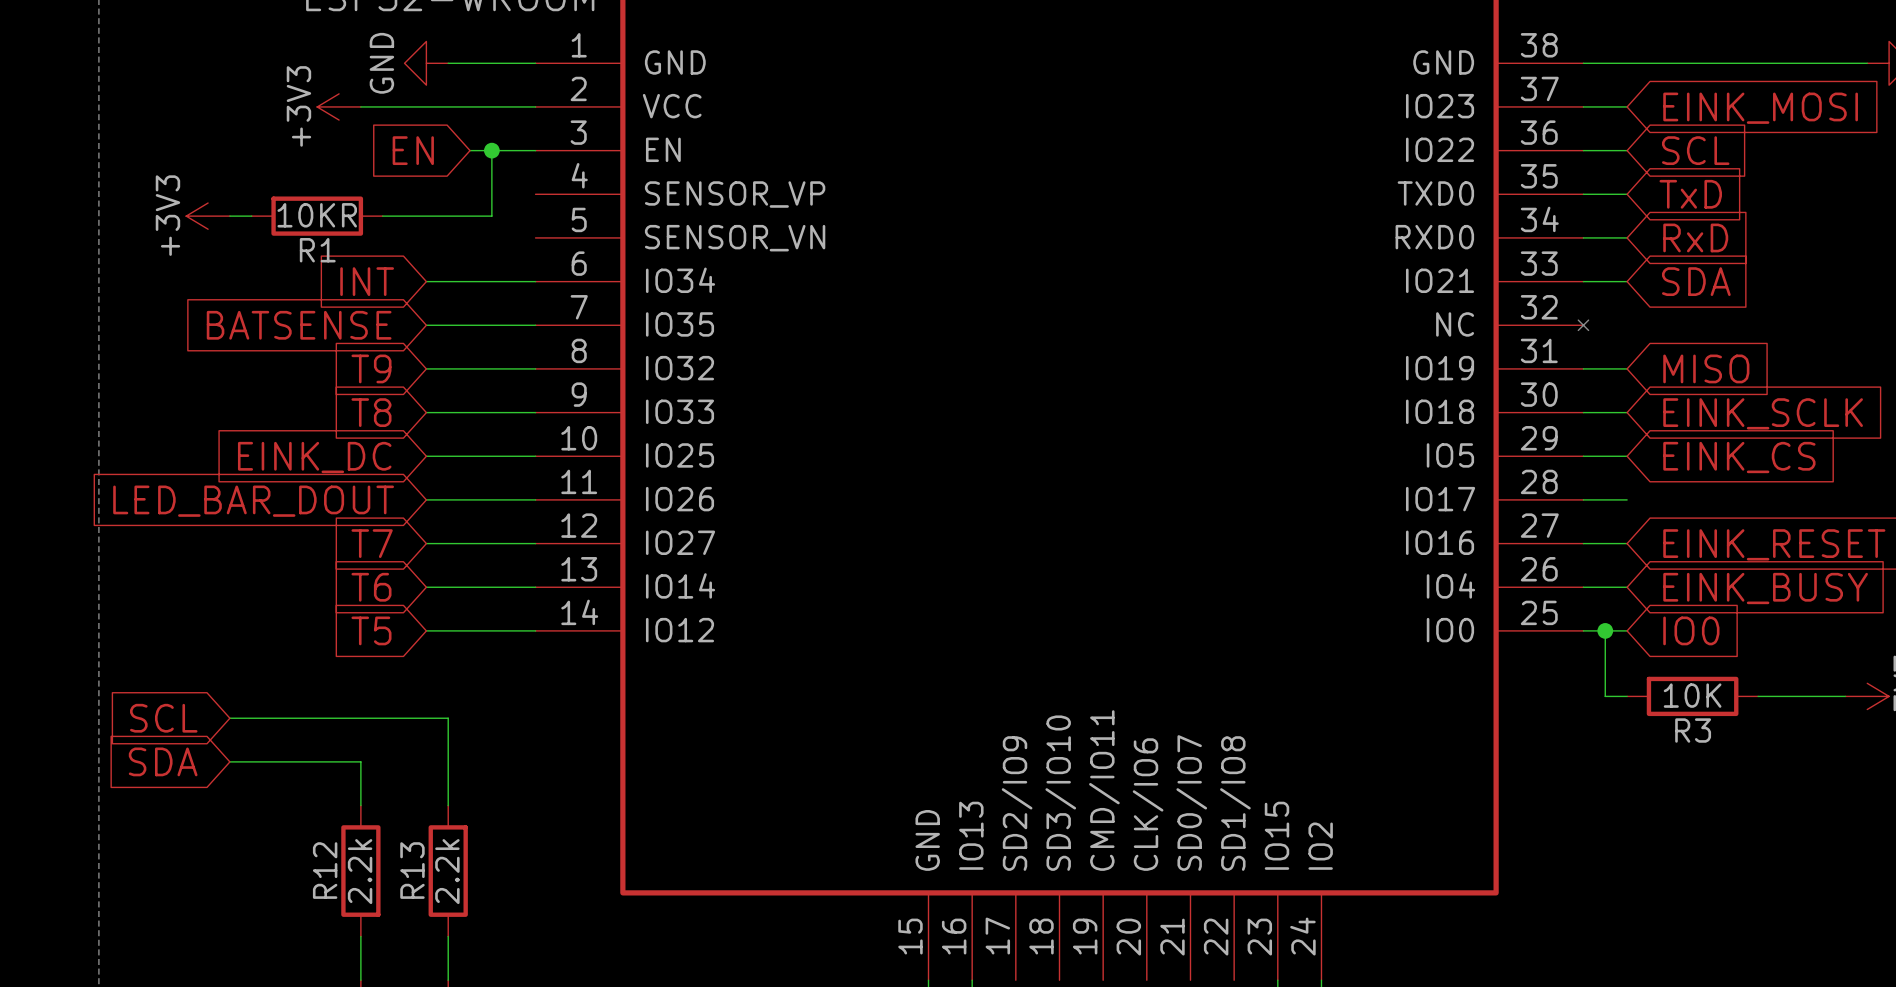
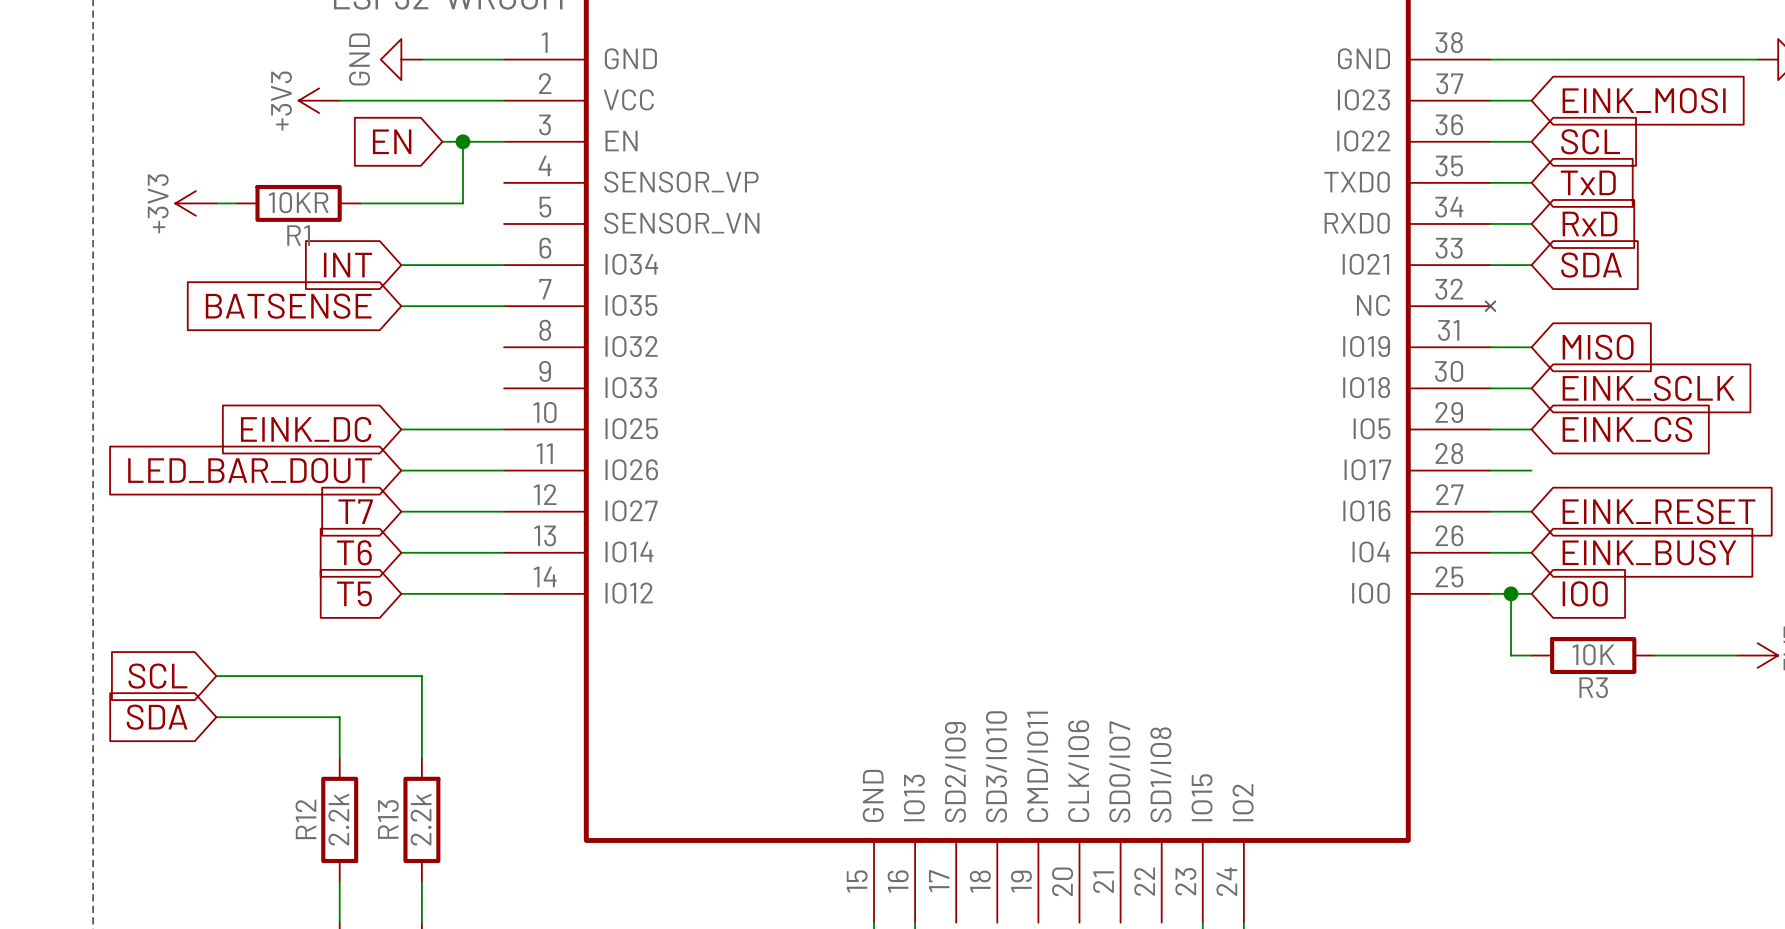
global label: T9 (371, 368) -> none
wire: (426, 368) (535, 368) -> none
global label: T8 (371, 412) -> none
wire: (426, 412) (535, 412) -> none

